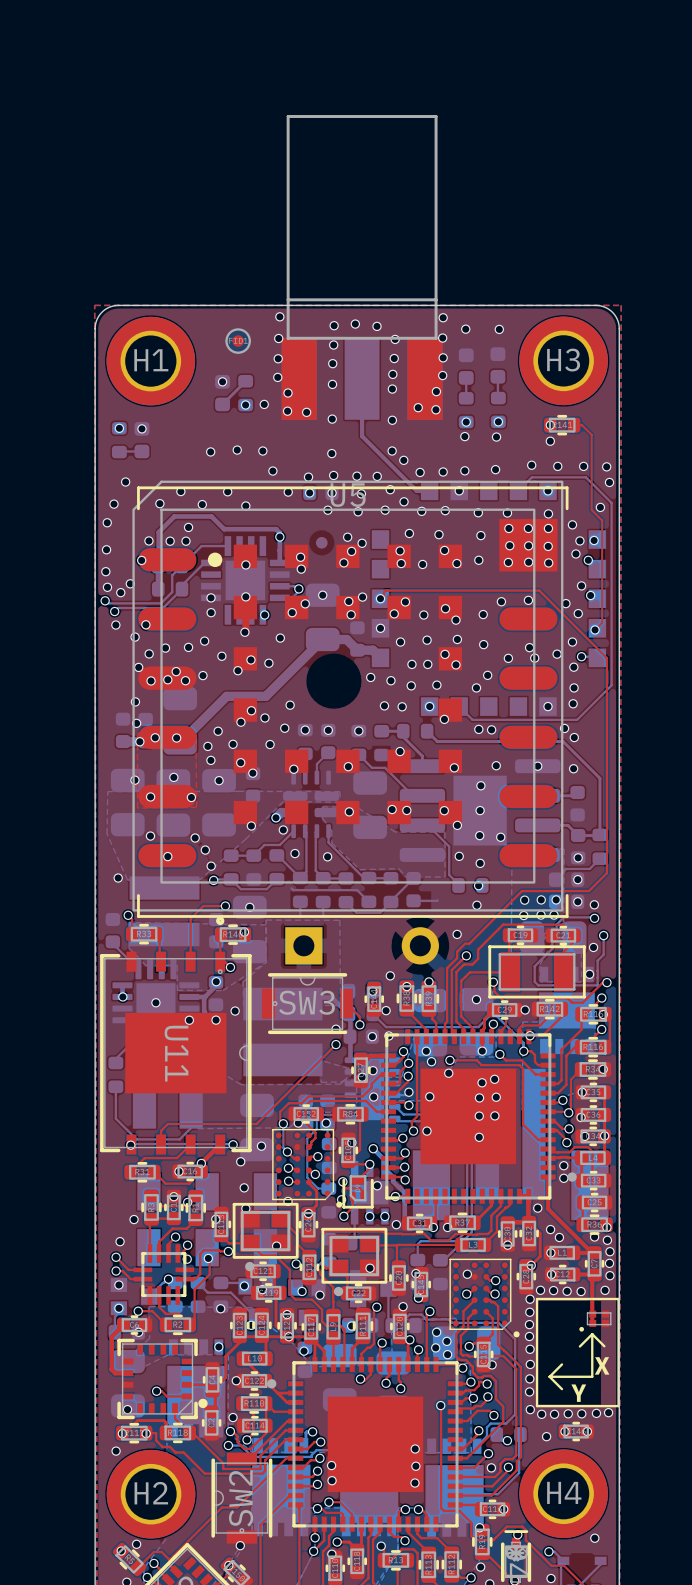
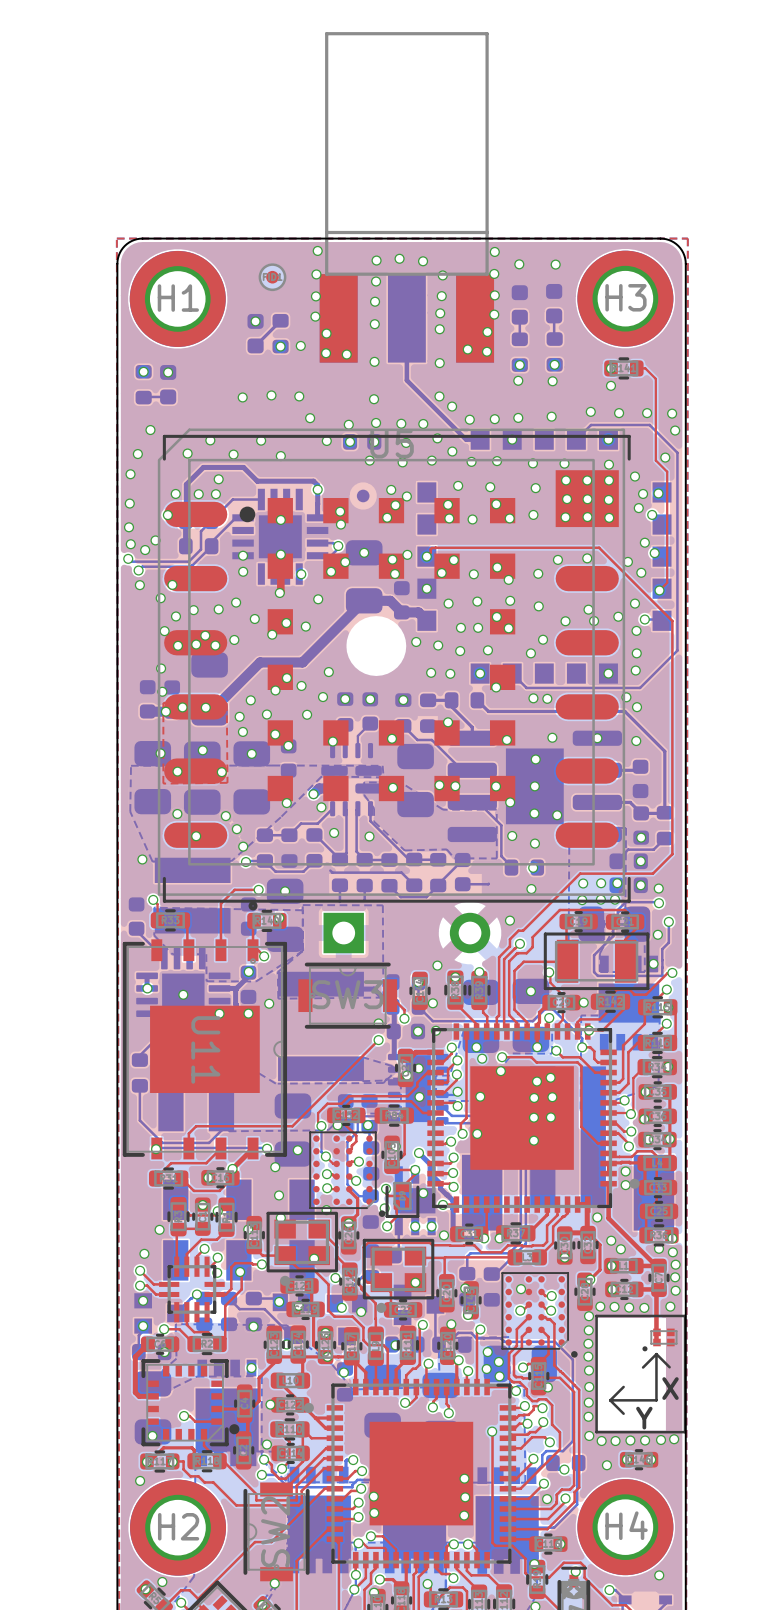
part footprint: [243, 987, 323, 1077] -> [278, 971, 364, 1082]

